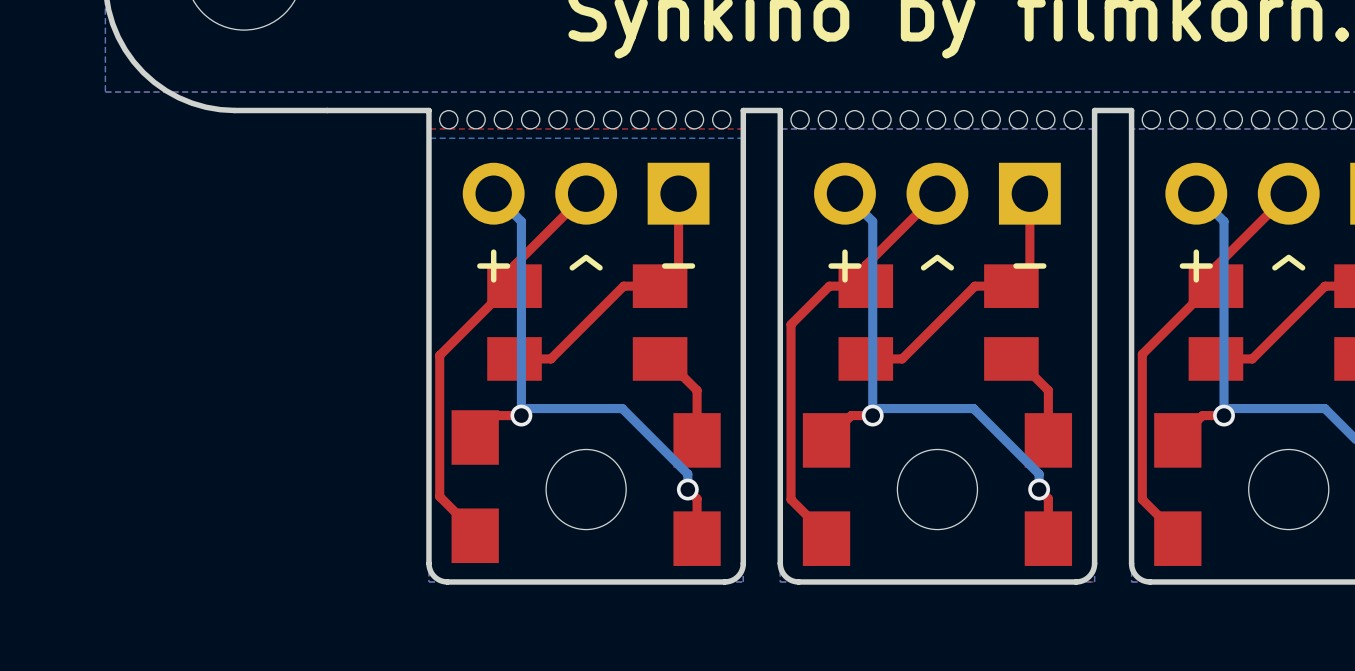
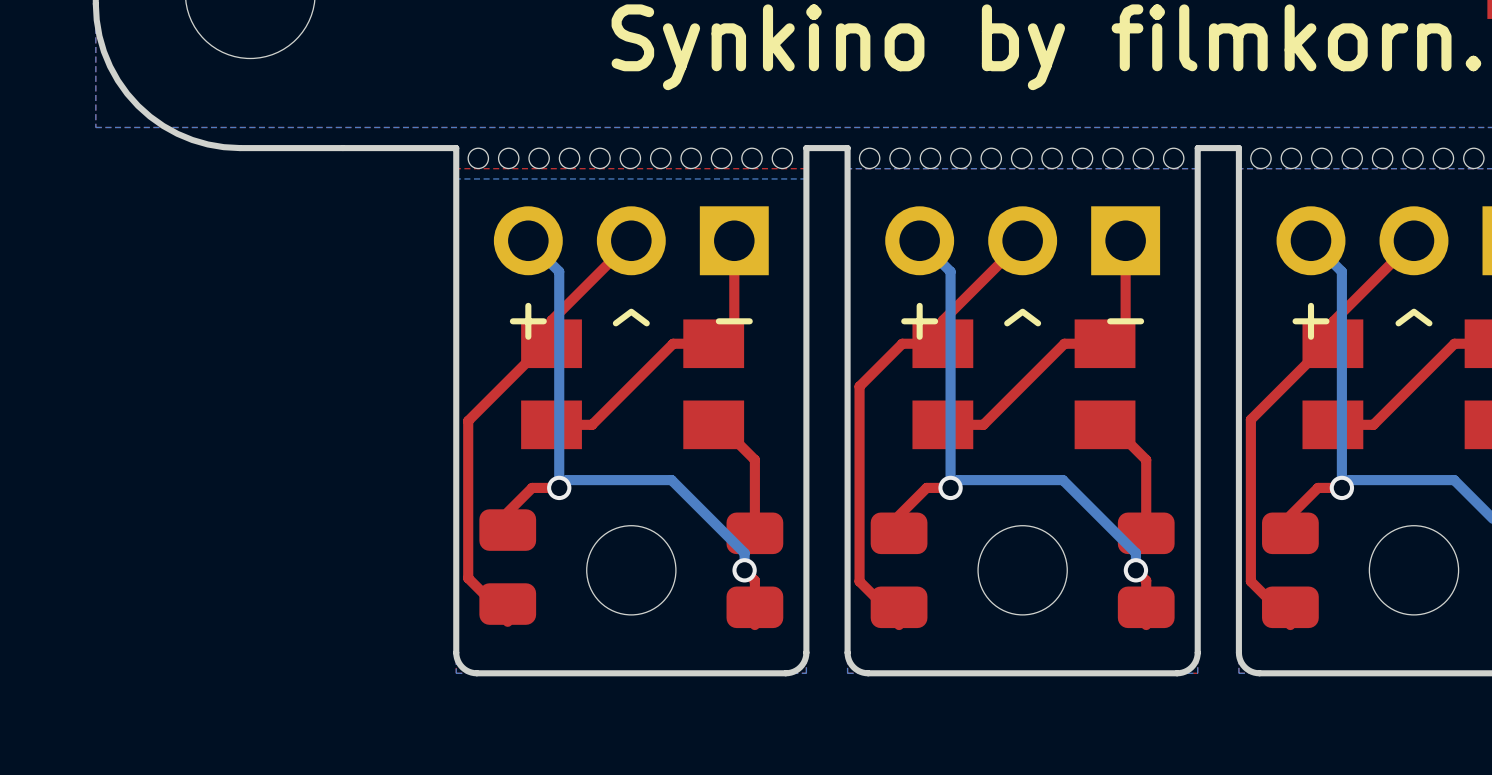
part footprint: [451, 410, 499, 564] -> [479, 509, 537, 625]
part footprint: [673, 413, 721, 566] -> [726, 512, 784, 629]
part footprint: [802, 413, 851, 566] -> [870, 512, 928, 629]
part footprint: [1024, 413, 1073, 566] -> [1117, 512, 1175, 629]
part footprint: [1154, 413, 1202, 566] -> [1262, 512, 1319, 629]

